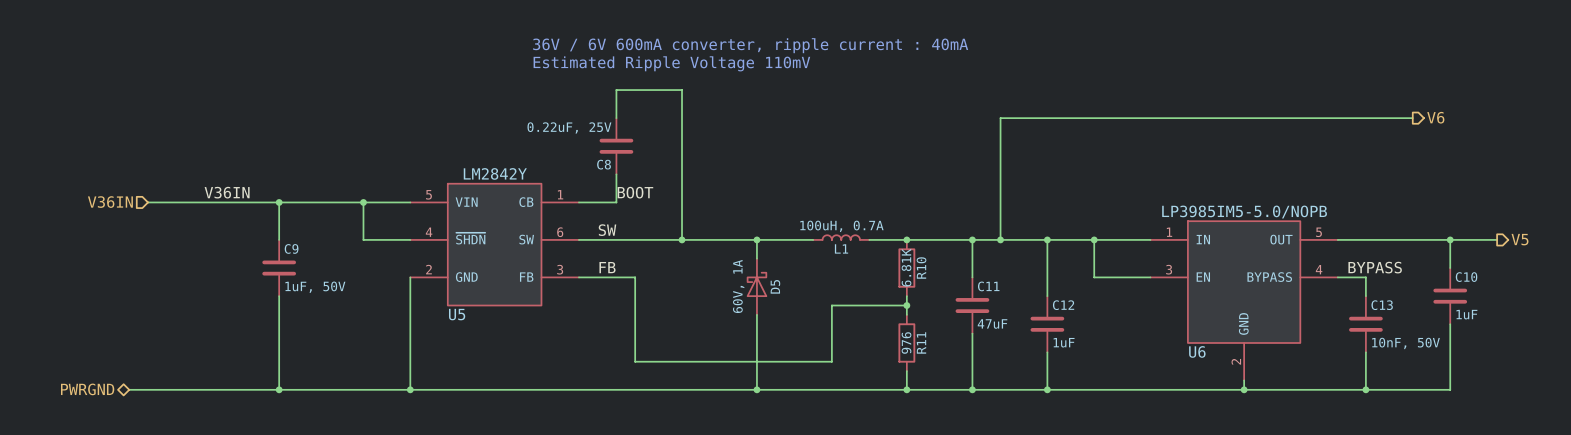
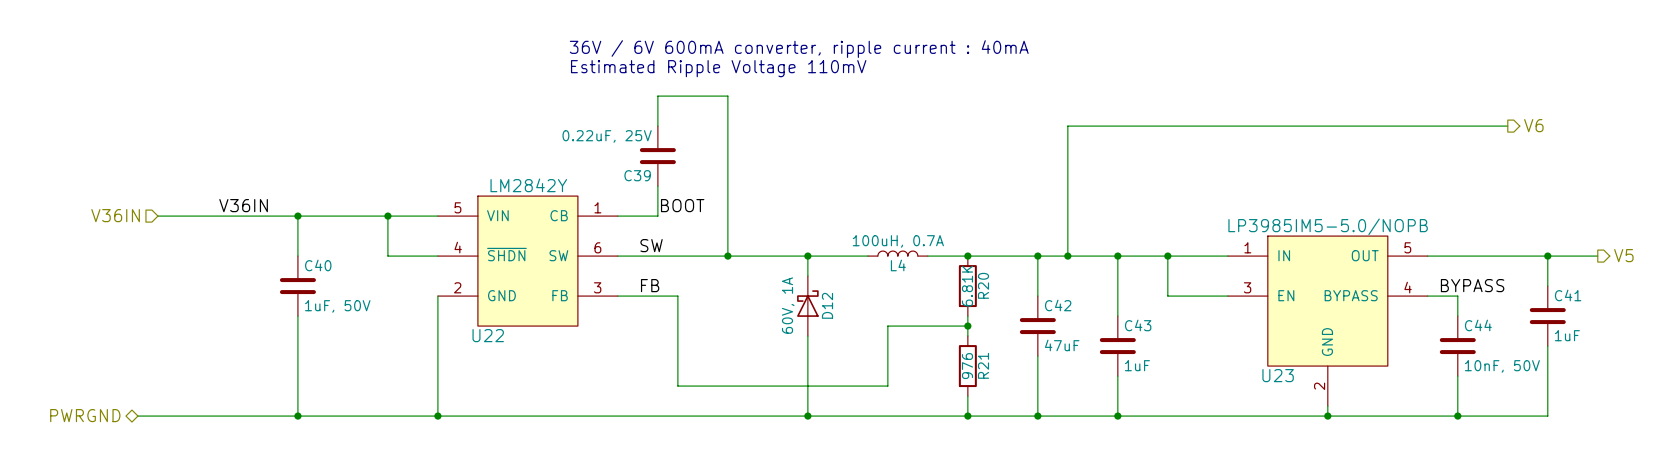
C8 name: C8 (604, 164) -> C39 (637, 175)
C9 name: C9 (291, 248) -> C40 (318, 265)
L1 name: L1 (841, 248) -> L4 (898, 265)
R10 name: R10 (921, 268) -> R20 (983, 285)
C10 name: C10 (1466, 277) -> C41 (1568, 295)
D5 name: D5 (775, 286) -> D12 (827, 305)
C11 name: C11 (988, 286) -> C42 (1058, 305)
C12 name: C12 (1063, 305) -> C43 (1138, 325)
C13 name: C13 (1382, 305) -> C44 (1478, 325)
U5 name: U5 (457, 314) -> U22 (488, 335)
R11 name: R11 (921, 342) -> R21 (983, 365)
U6 name: U6 (1197, 351) -> U23 (1278, 375)

